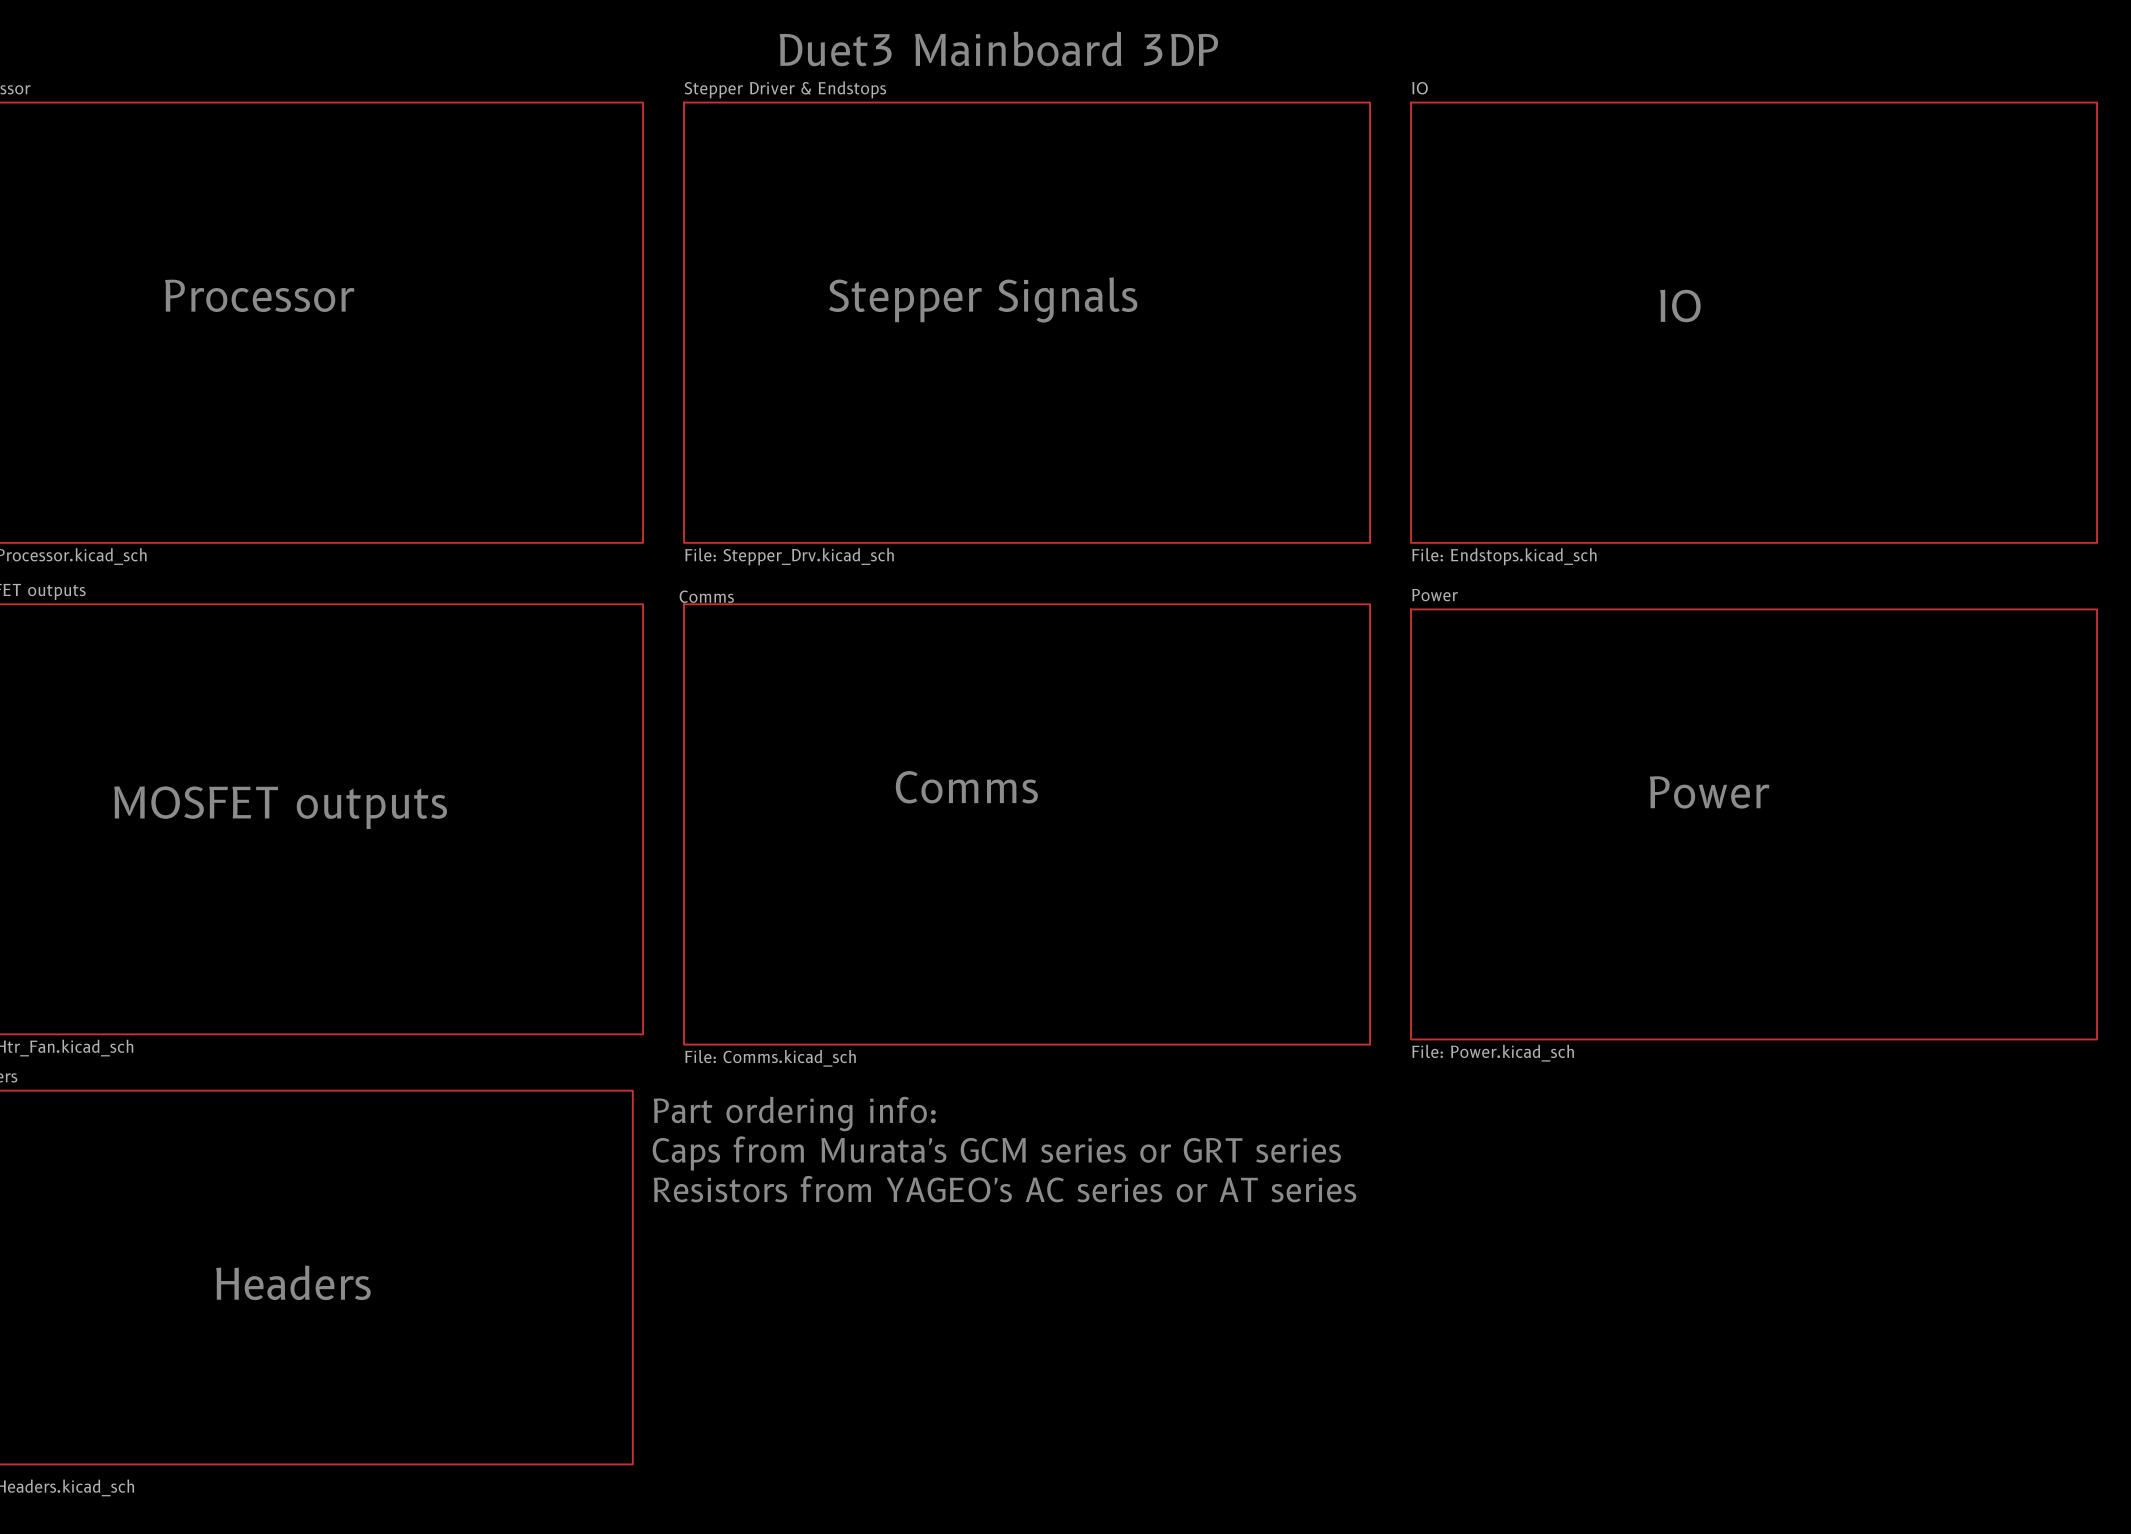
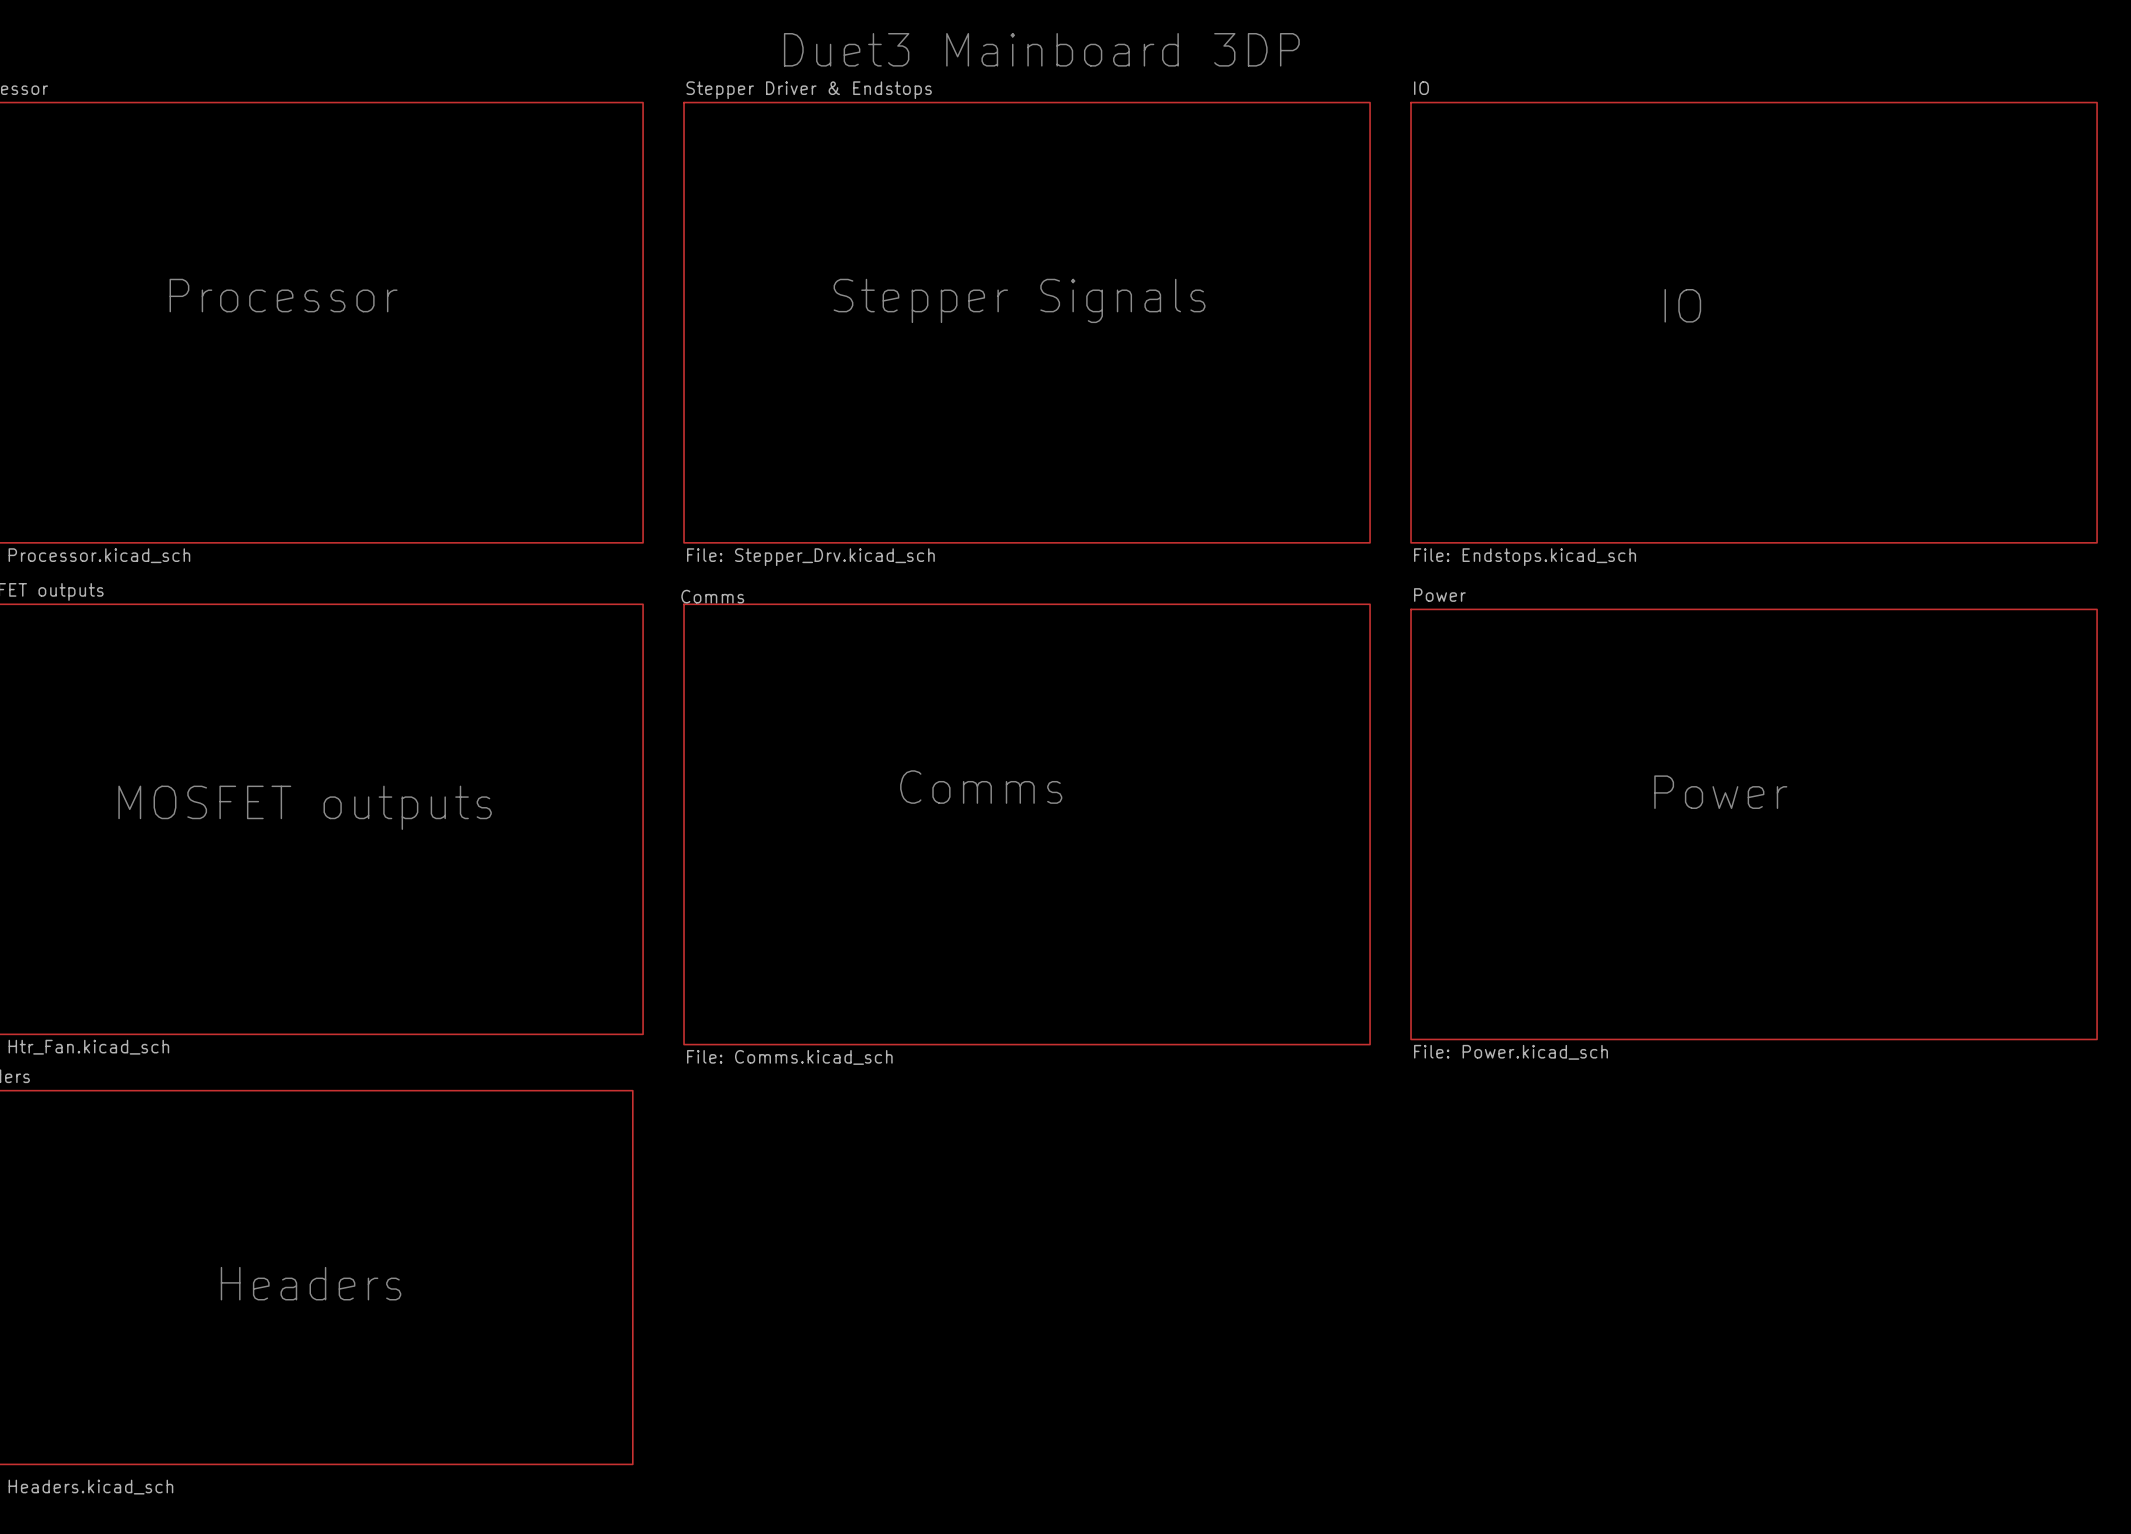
text: Part ordering info: (794, 1113) -> none
text: Caps from Murata's GCM series or GRT series (996, 1153) -> none
text: Resistors from YAGEO's AC series or AT series (1004, 1189) -> none

